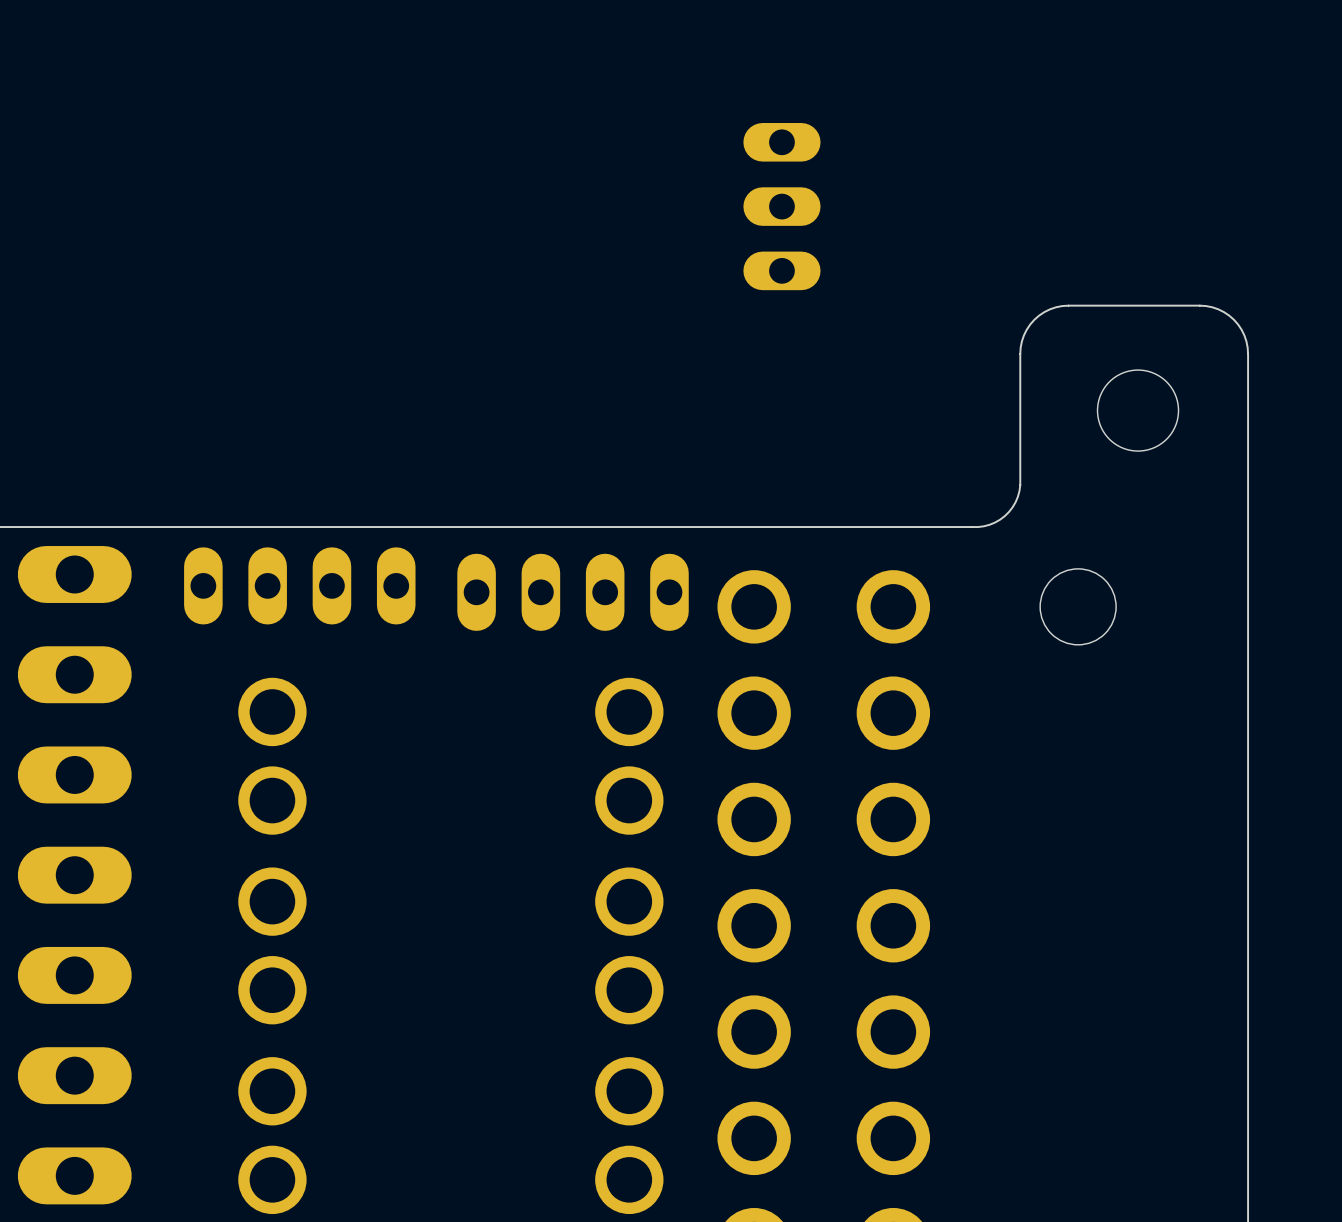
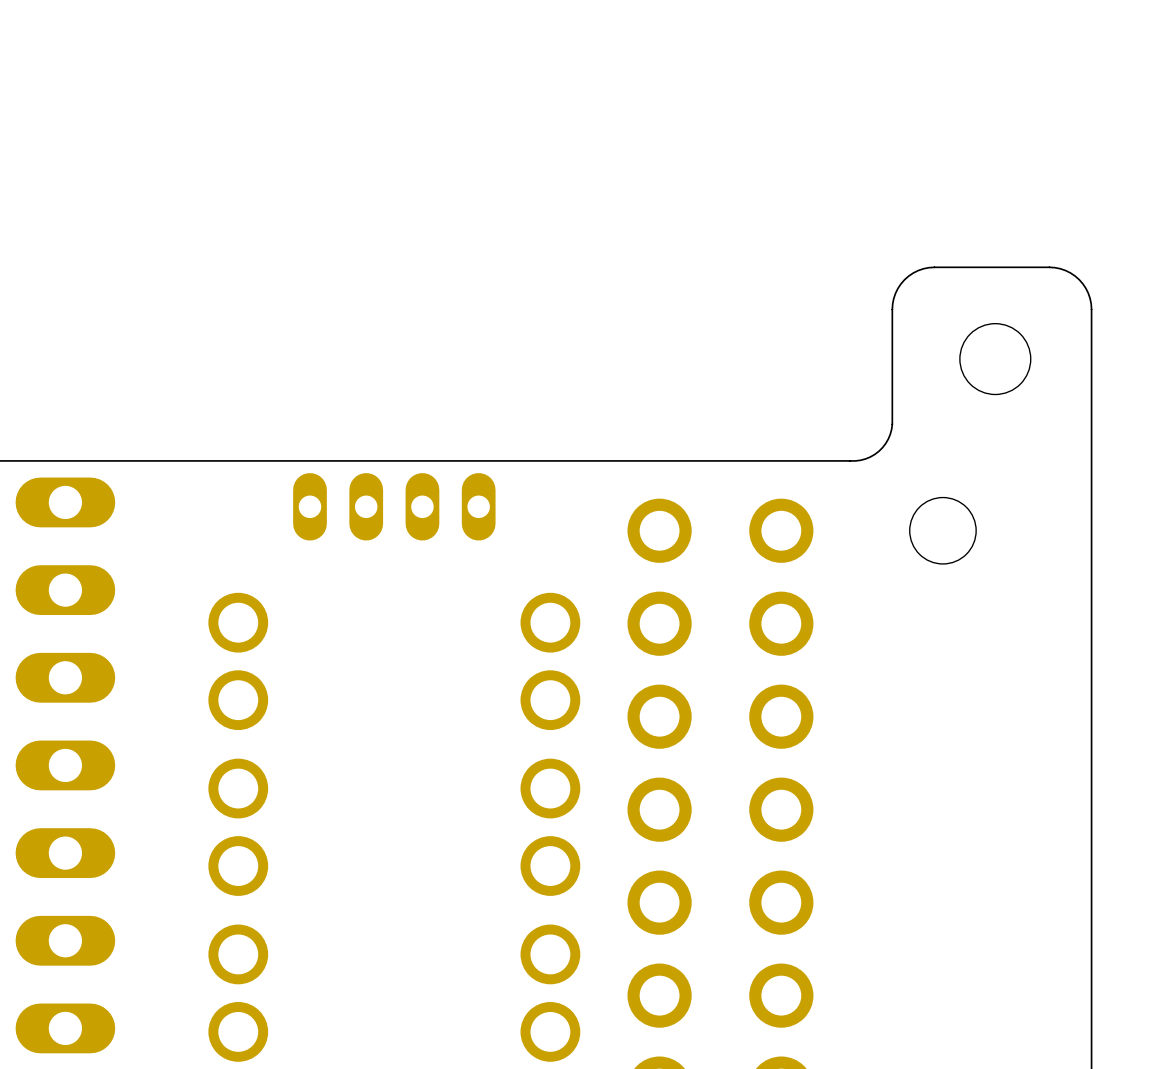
part: (781, 206) -> none
part: none -> (394, 506)
part: (299, 585) -> none
part: (573, 592) -> none

